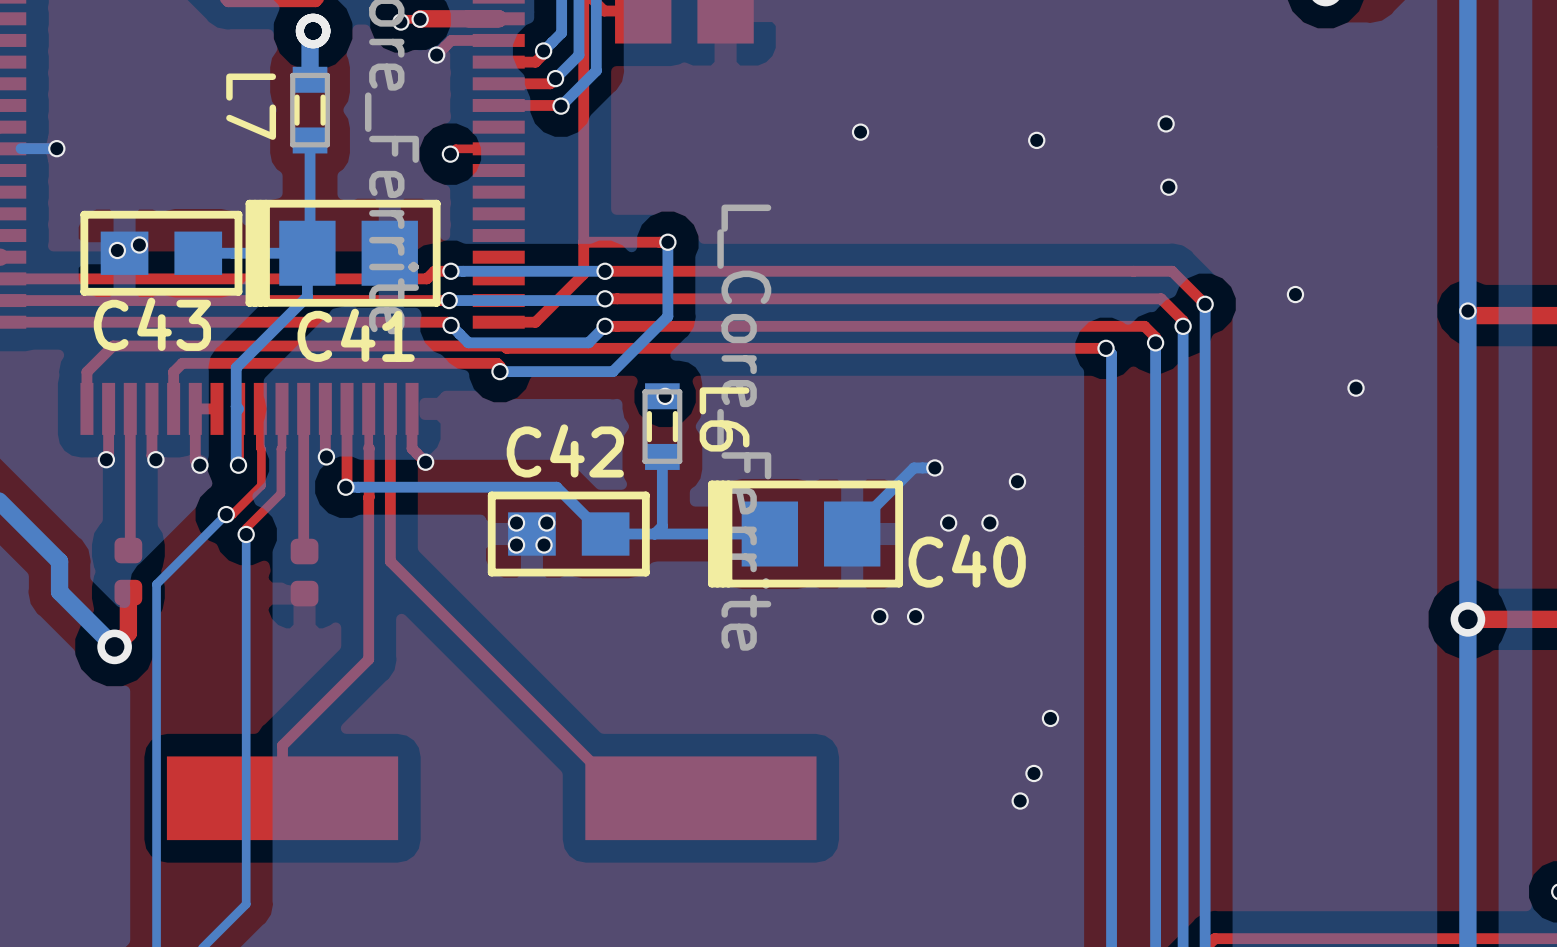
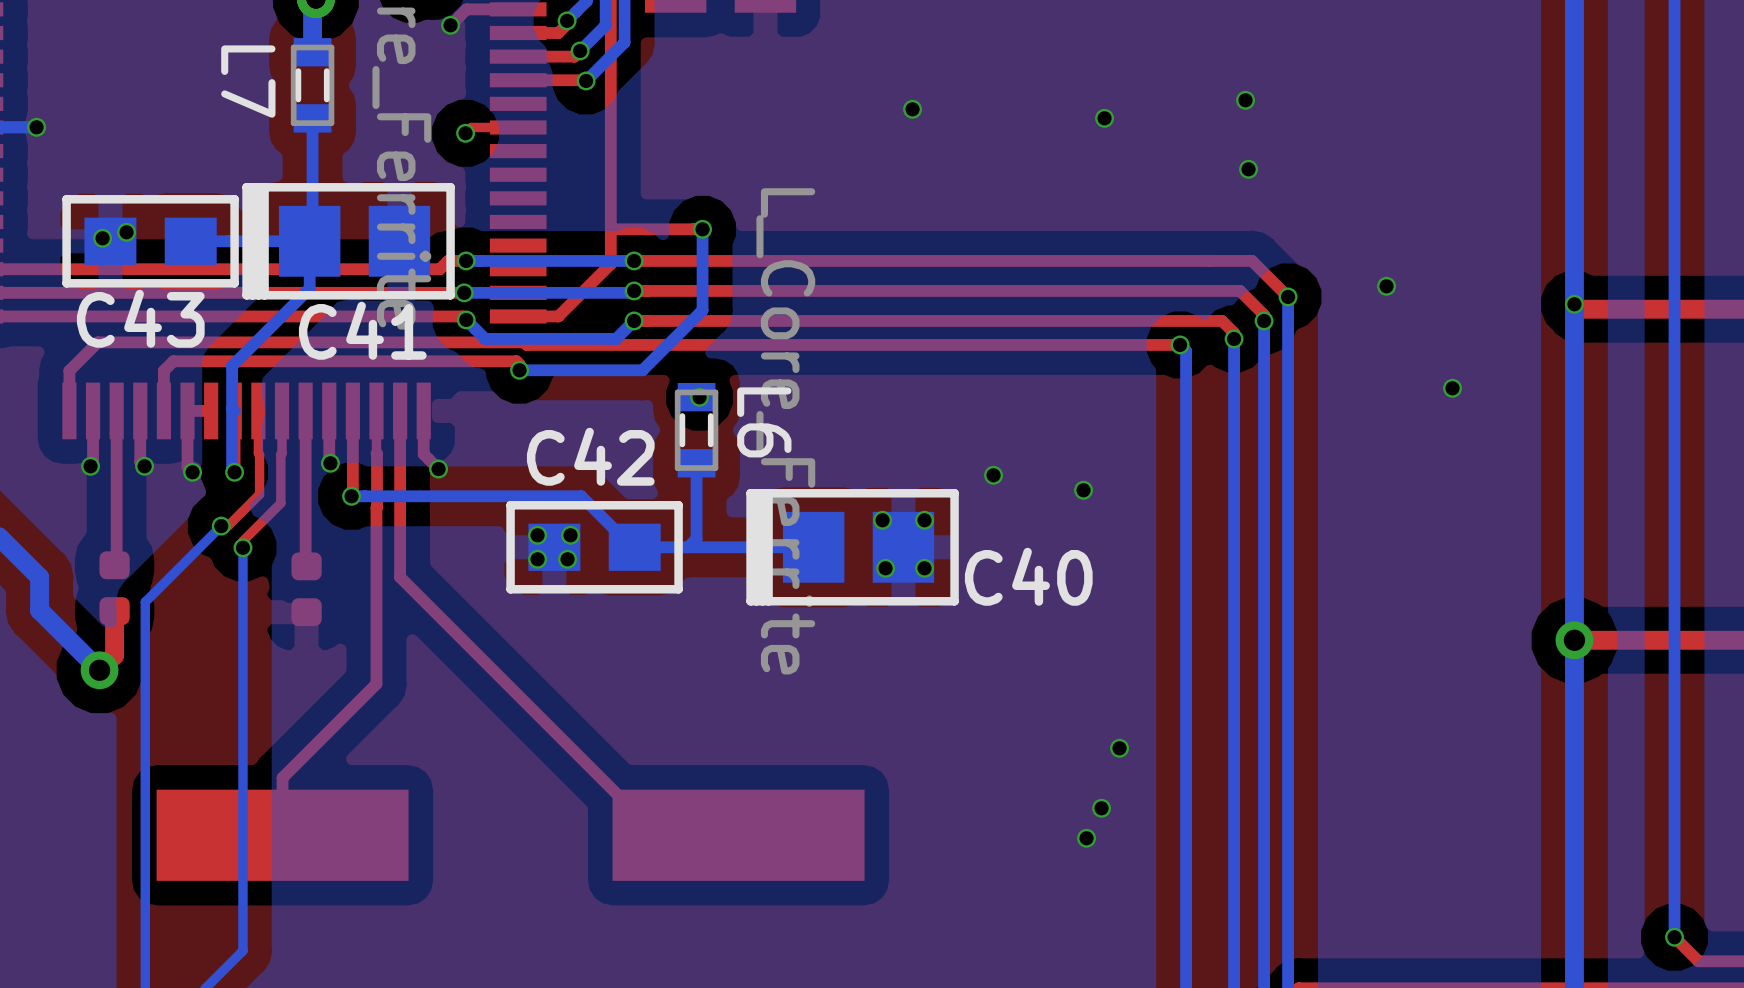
bottom track: (934, 467) (913, 467) (852, 529) (852, 534) -> none
via: none -> (882, 520)
via: none -> (924, 520)
via: (948, 523) -> none
via: (989, 523) -> none
via: none -> (885, 568)
via: none -> (924, 568)
via: (879, 616) -> none
via: (915, 616) -> none

